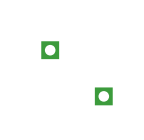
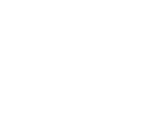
part: (50, 50) -> none
part: (103, 96) -> none

